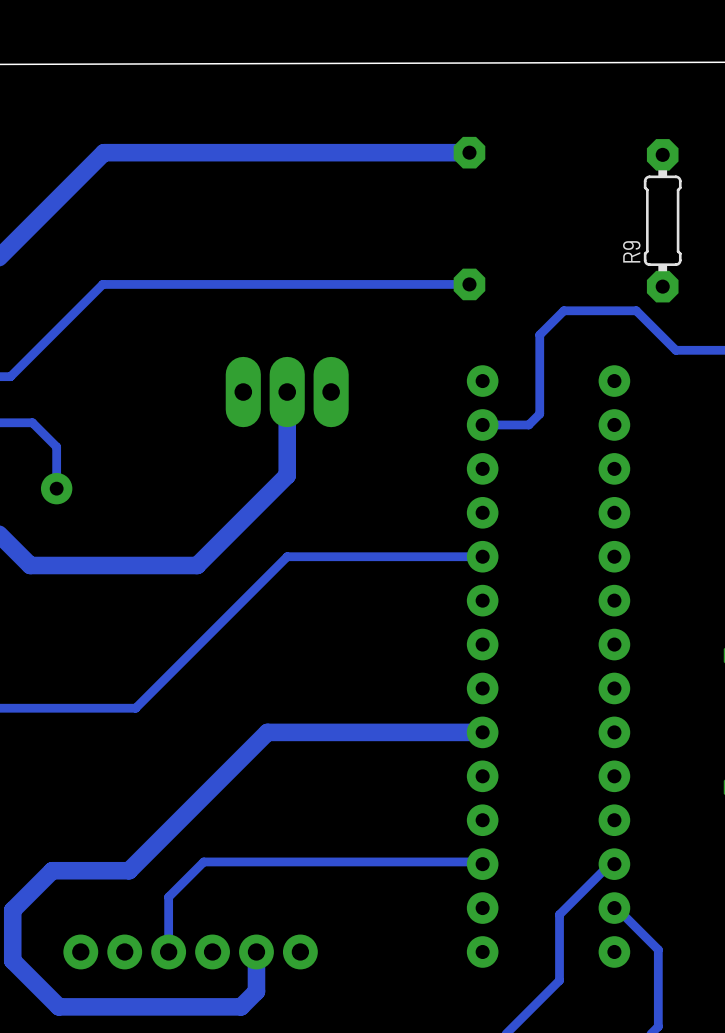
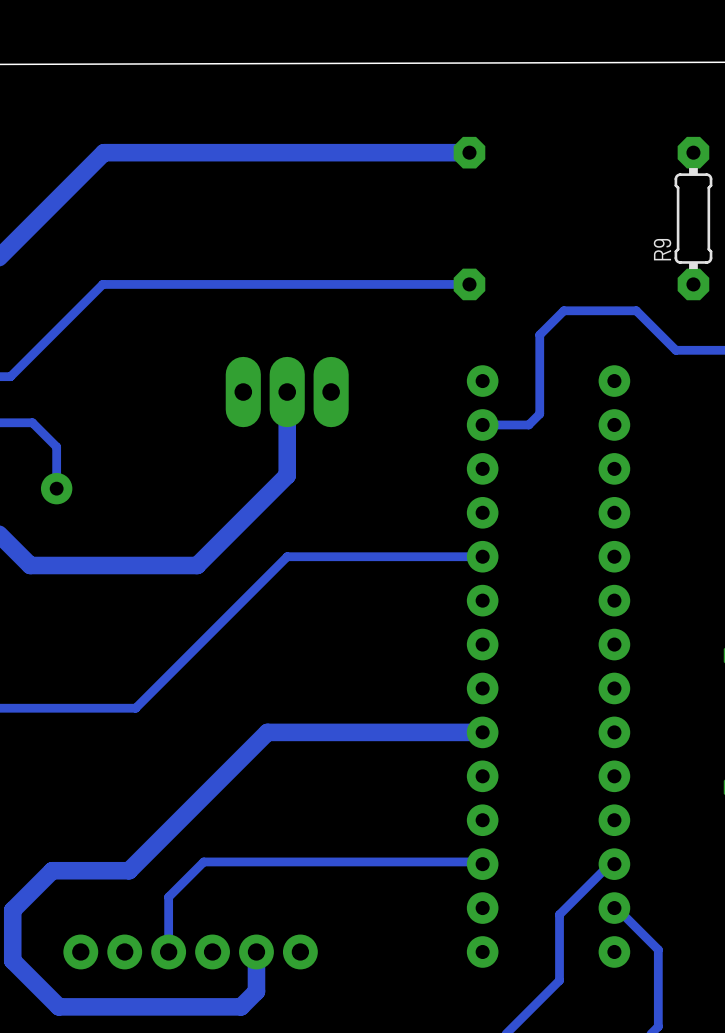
R9 position: (662, 220) -> (693, 218)

